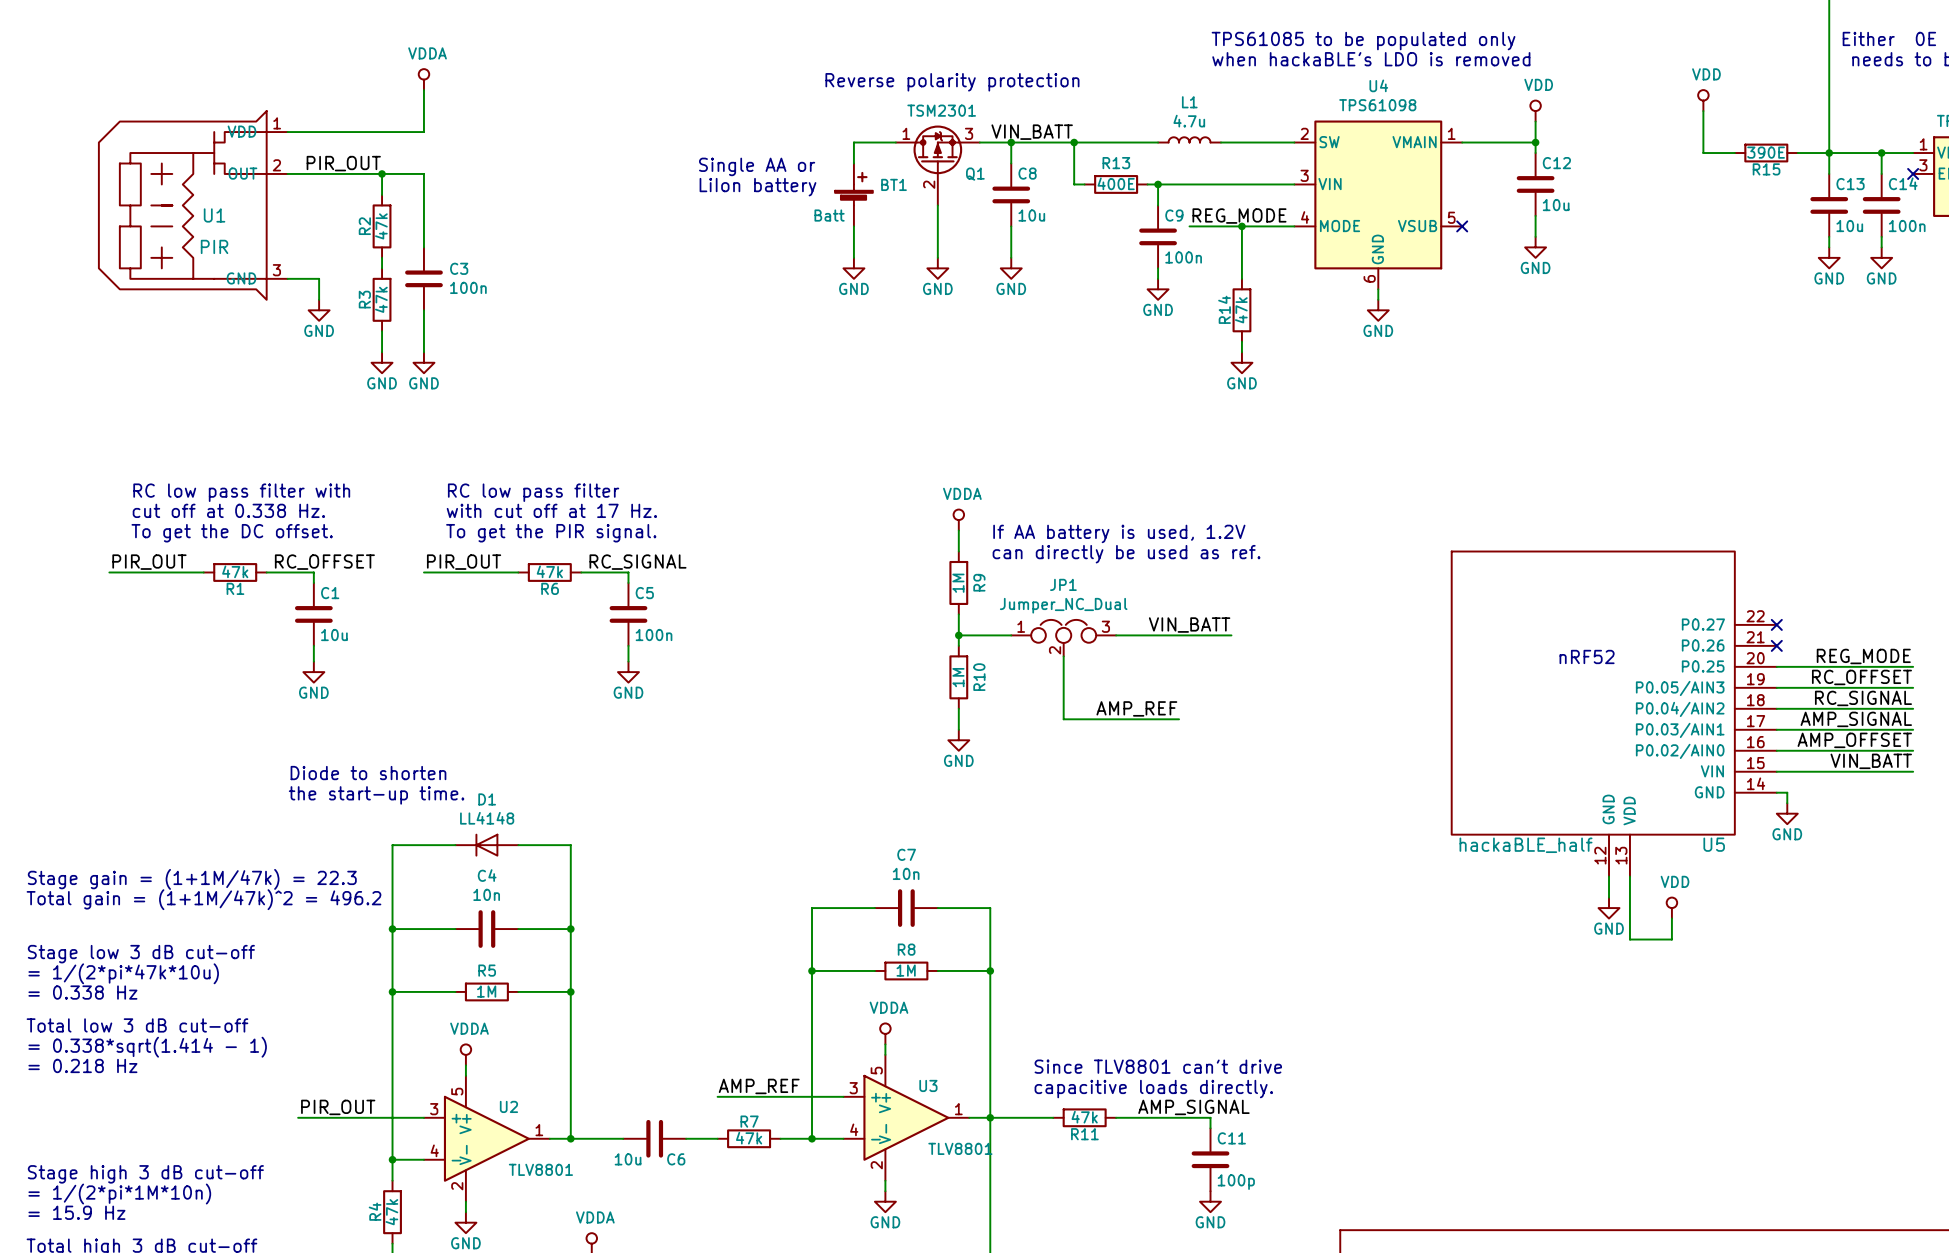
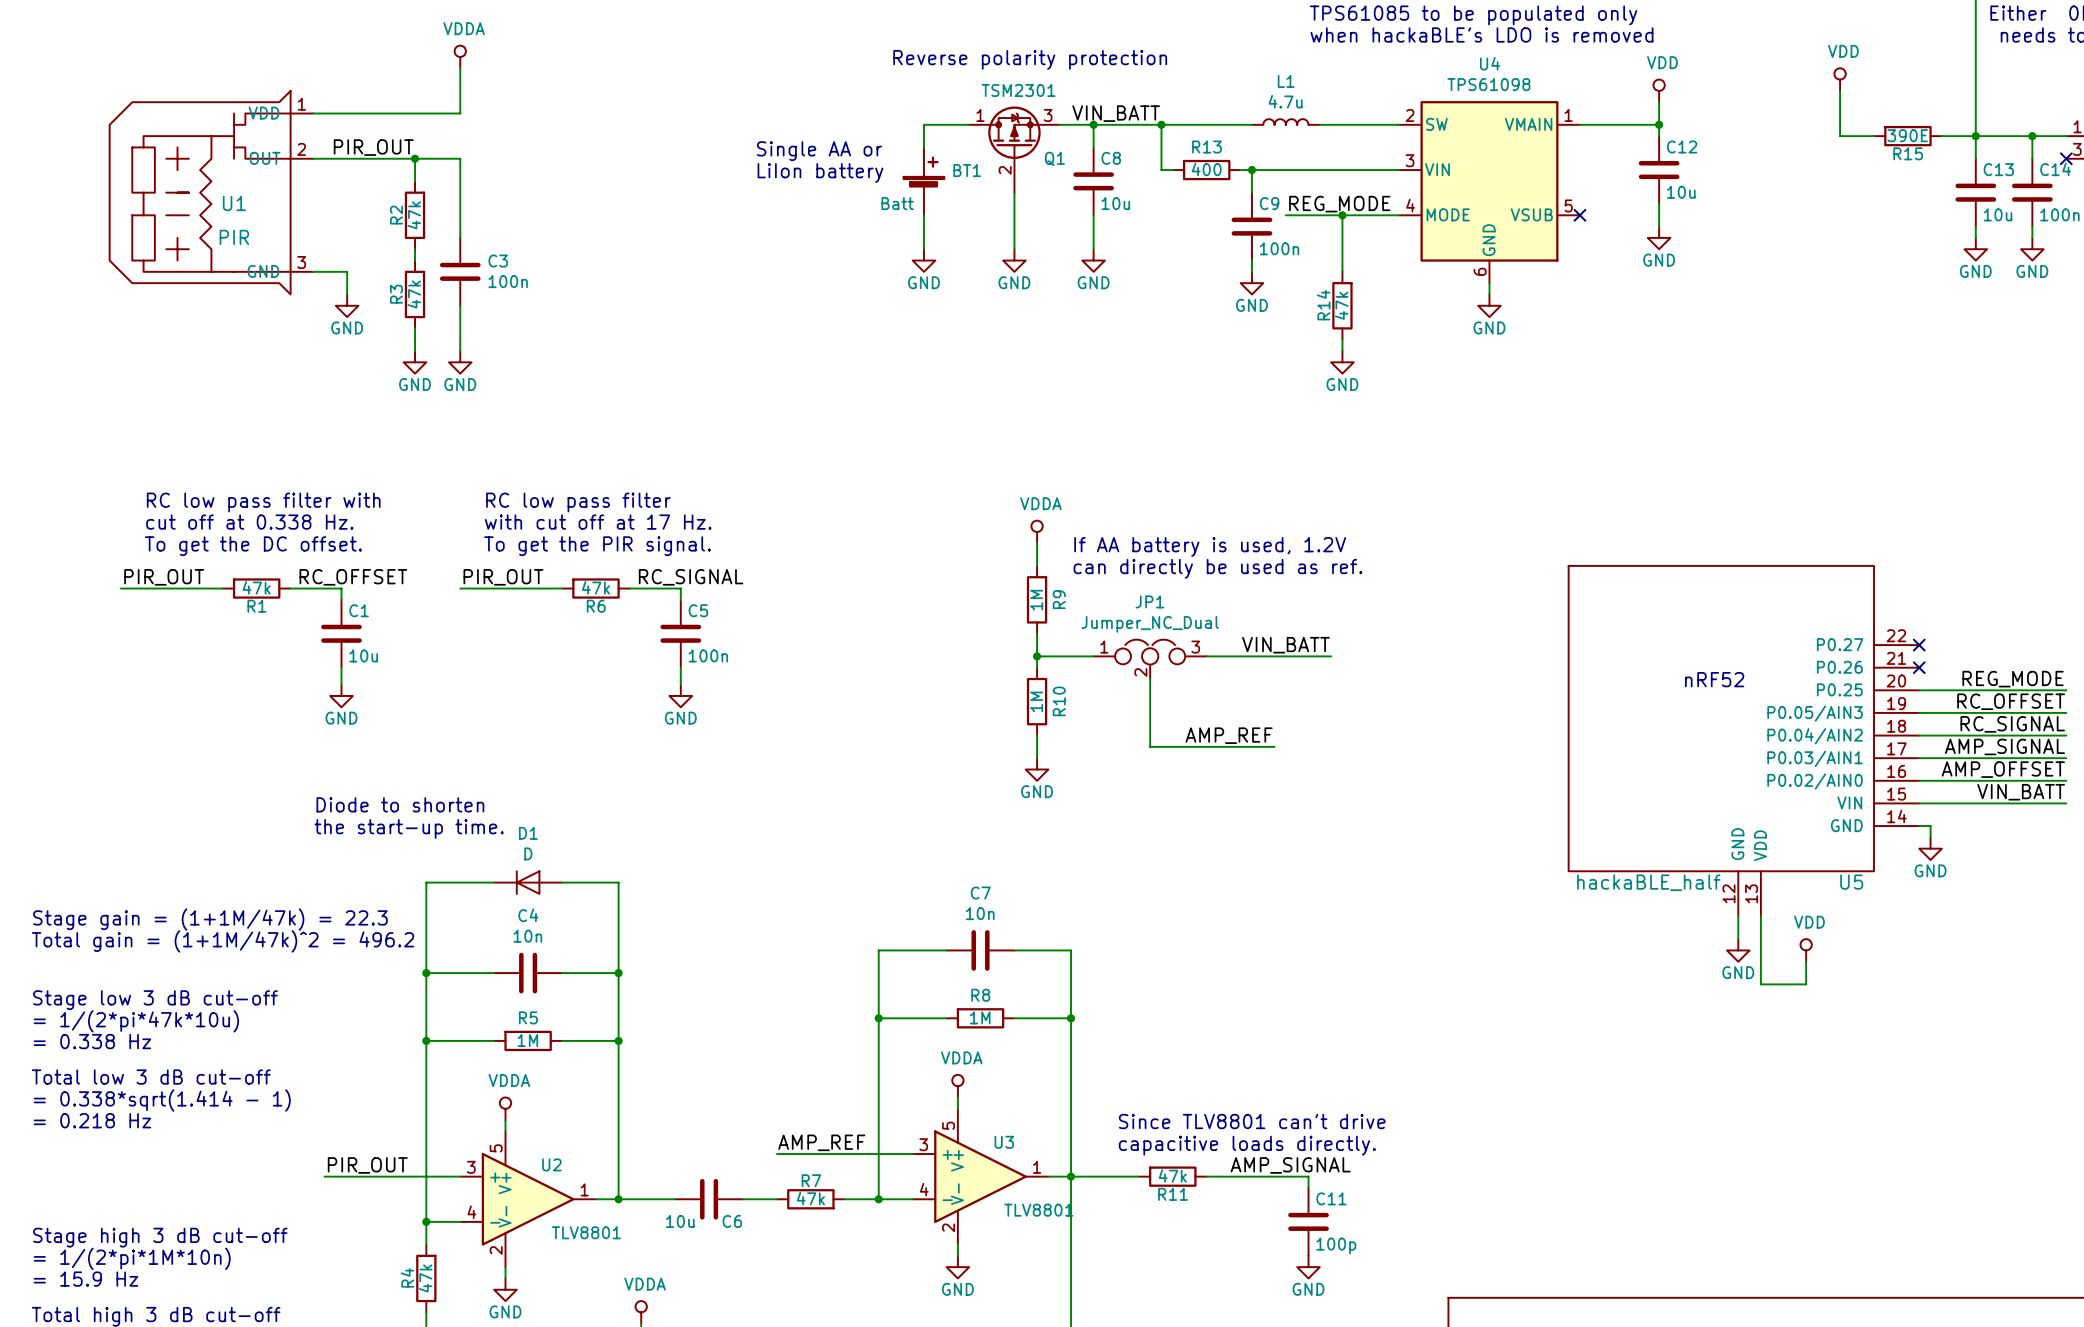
R13 value: 400E (1116, 183) -> 400 (1206, 169)
D1 value: LL4148 (487, 818) -> D (528, 853)

